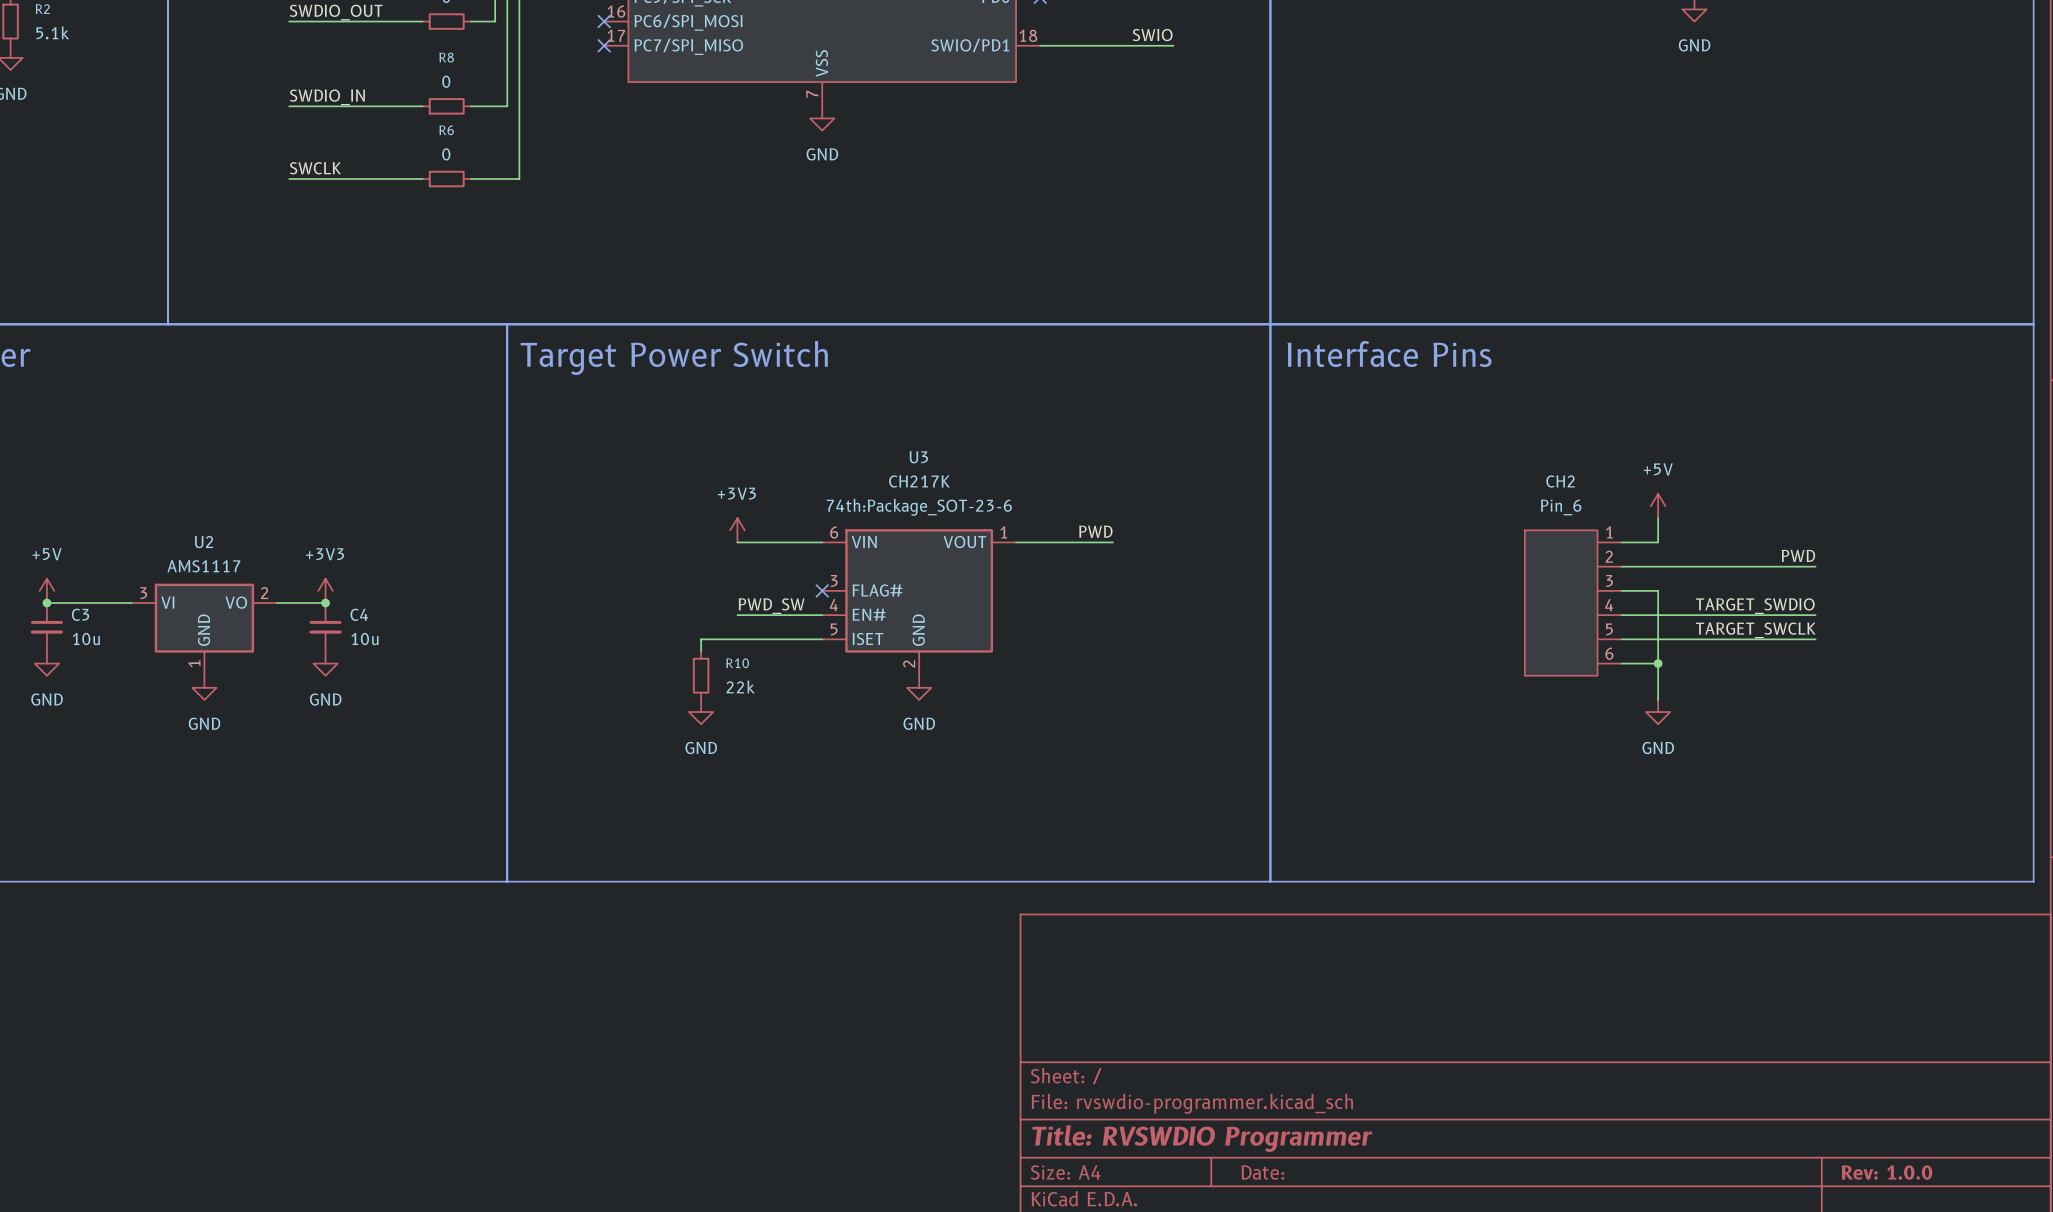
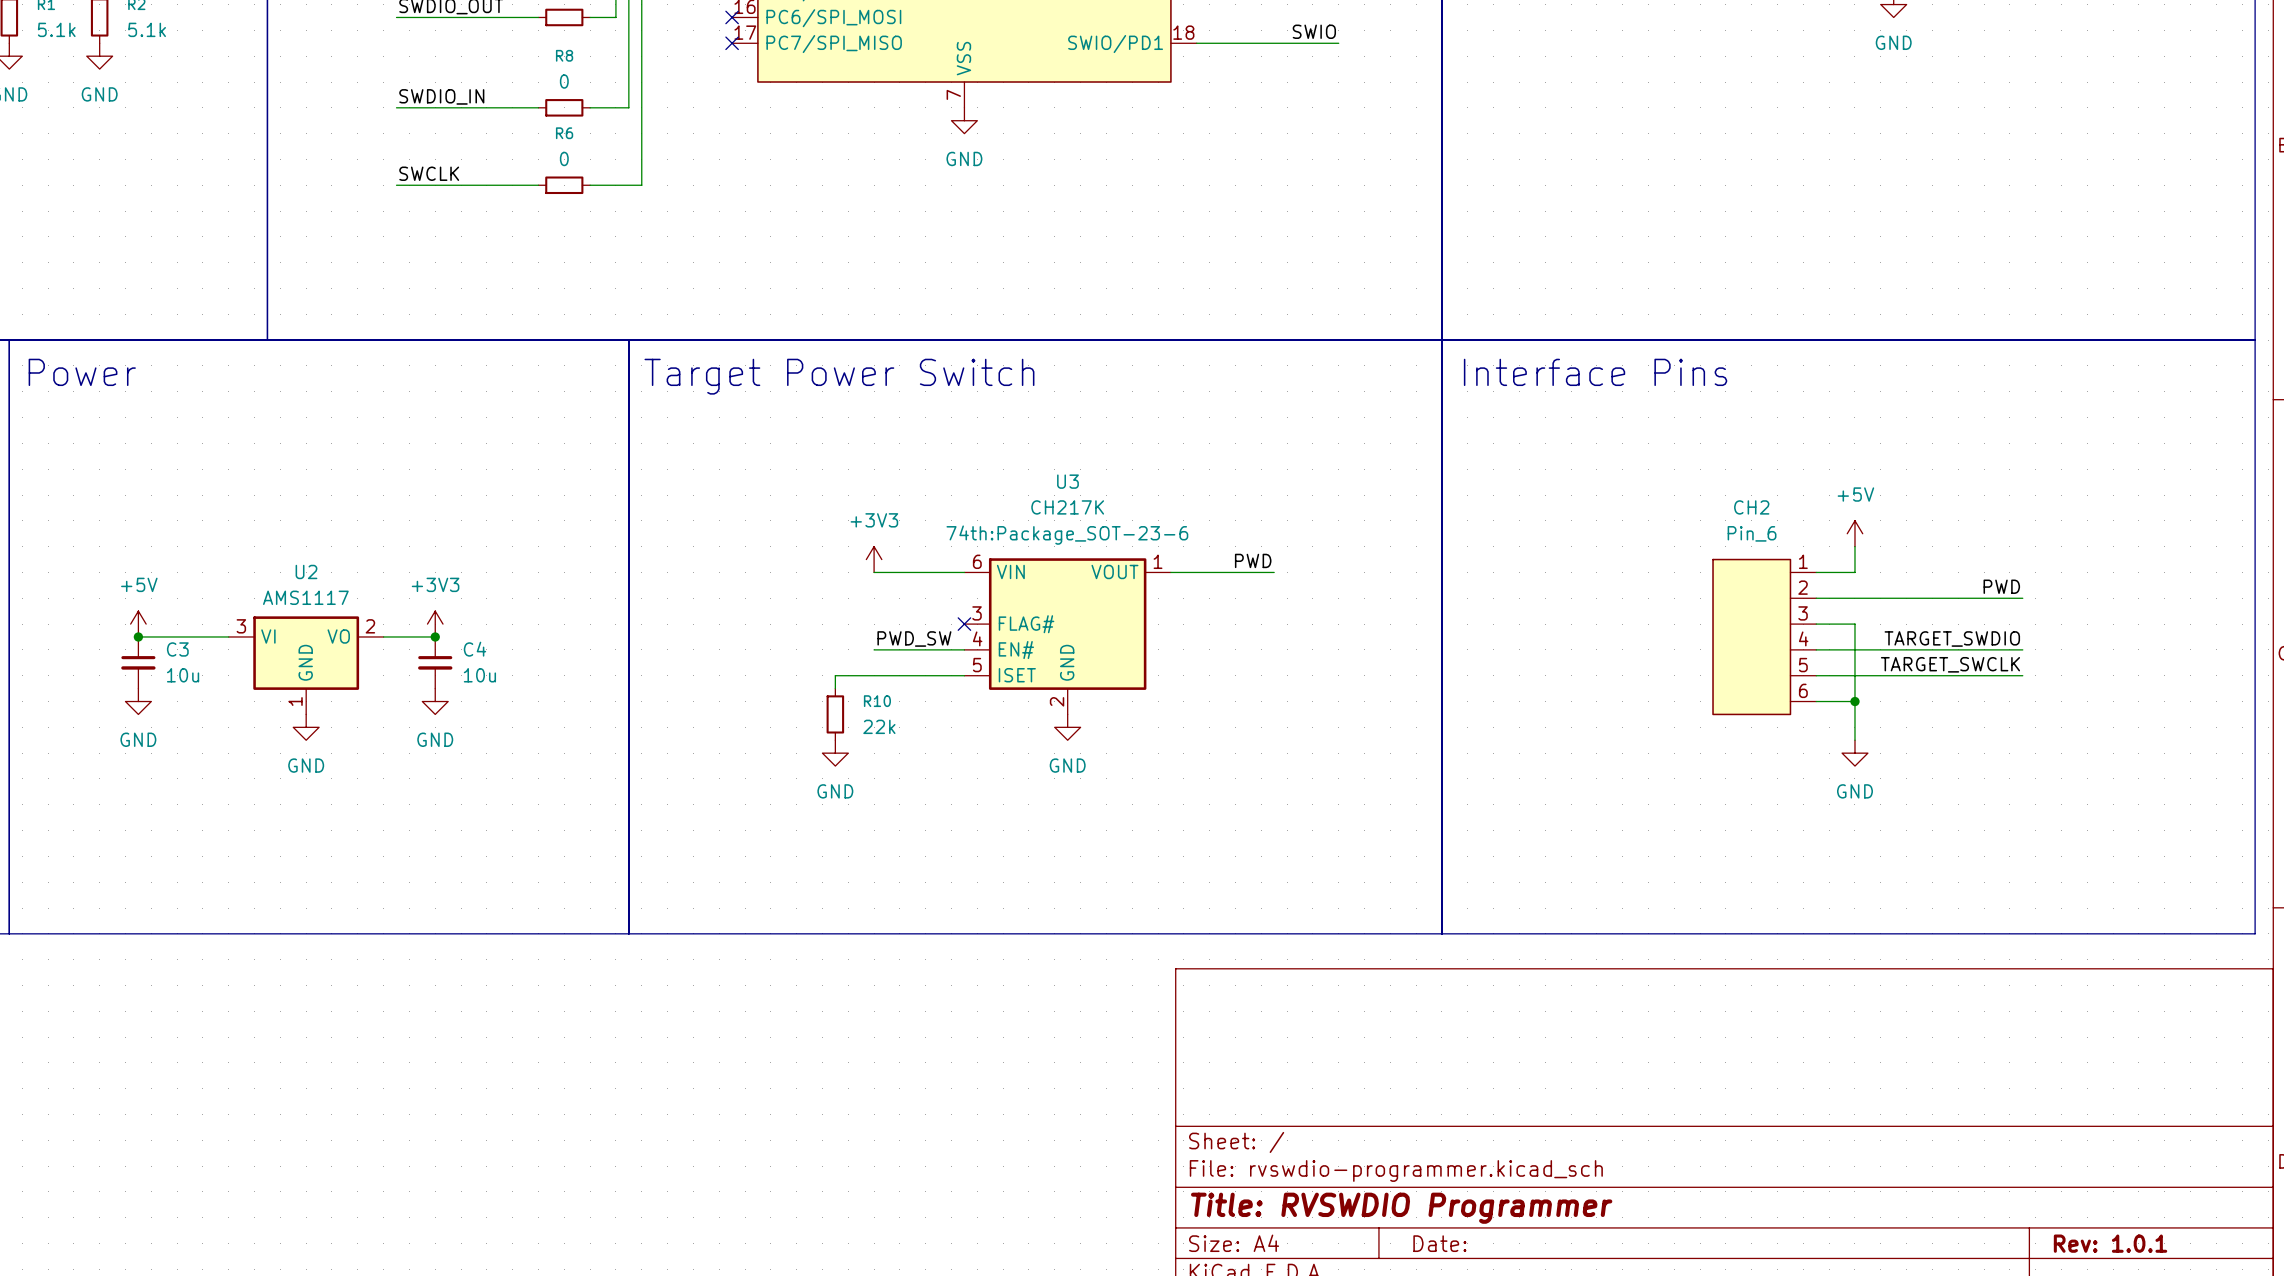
title block: Rev: 1.0.0 (1886, 1172) -> Rev: 1.0.1 (2110, 1243)

